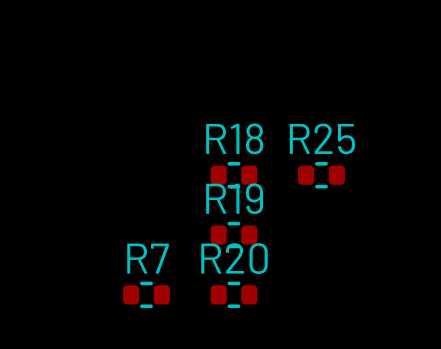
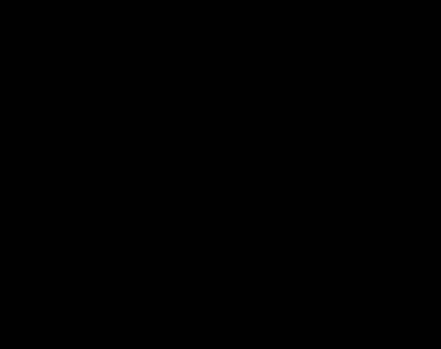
R18: (233, 175) -> none
R25: (321, 175) -> none
R19: (233, 235) -> none
R7: (146, 294) -> none
R20: (233, 294) -> none

